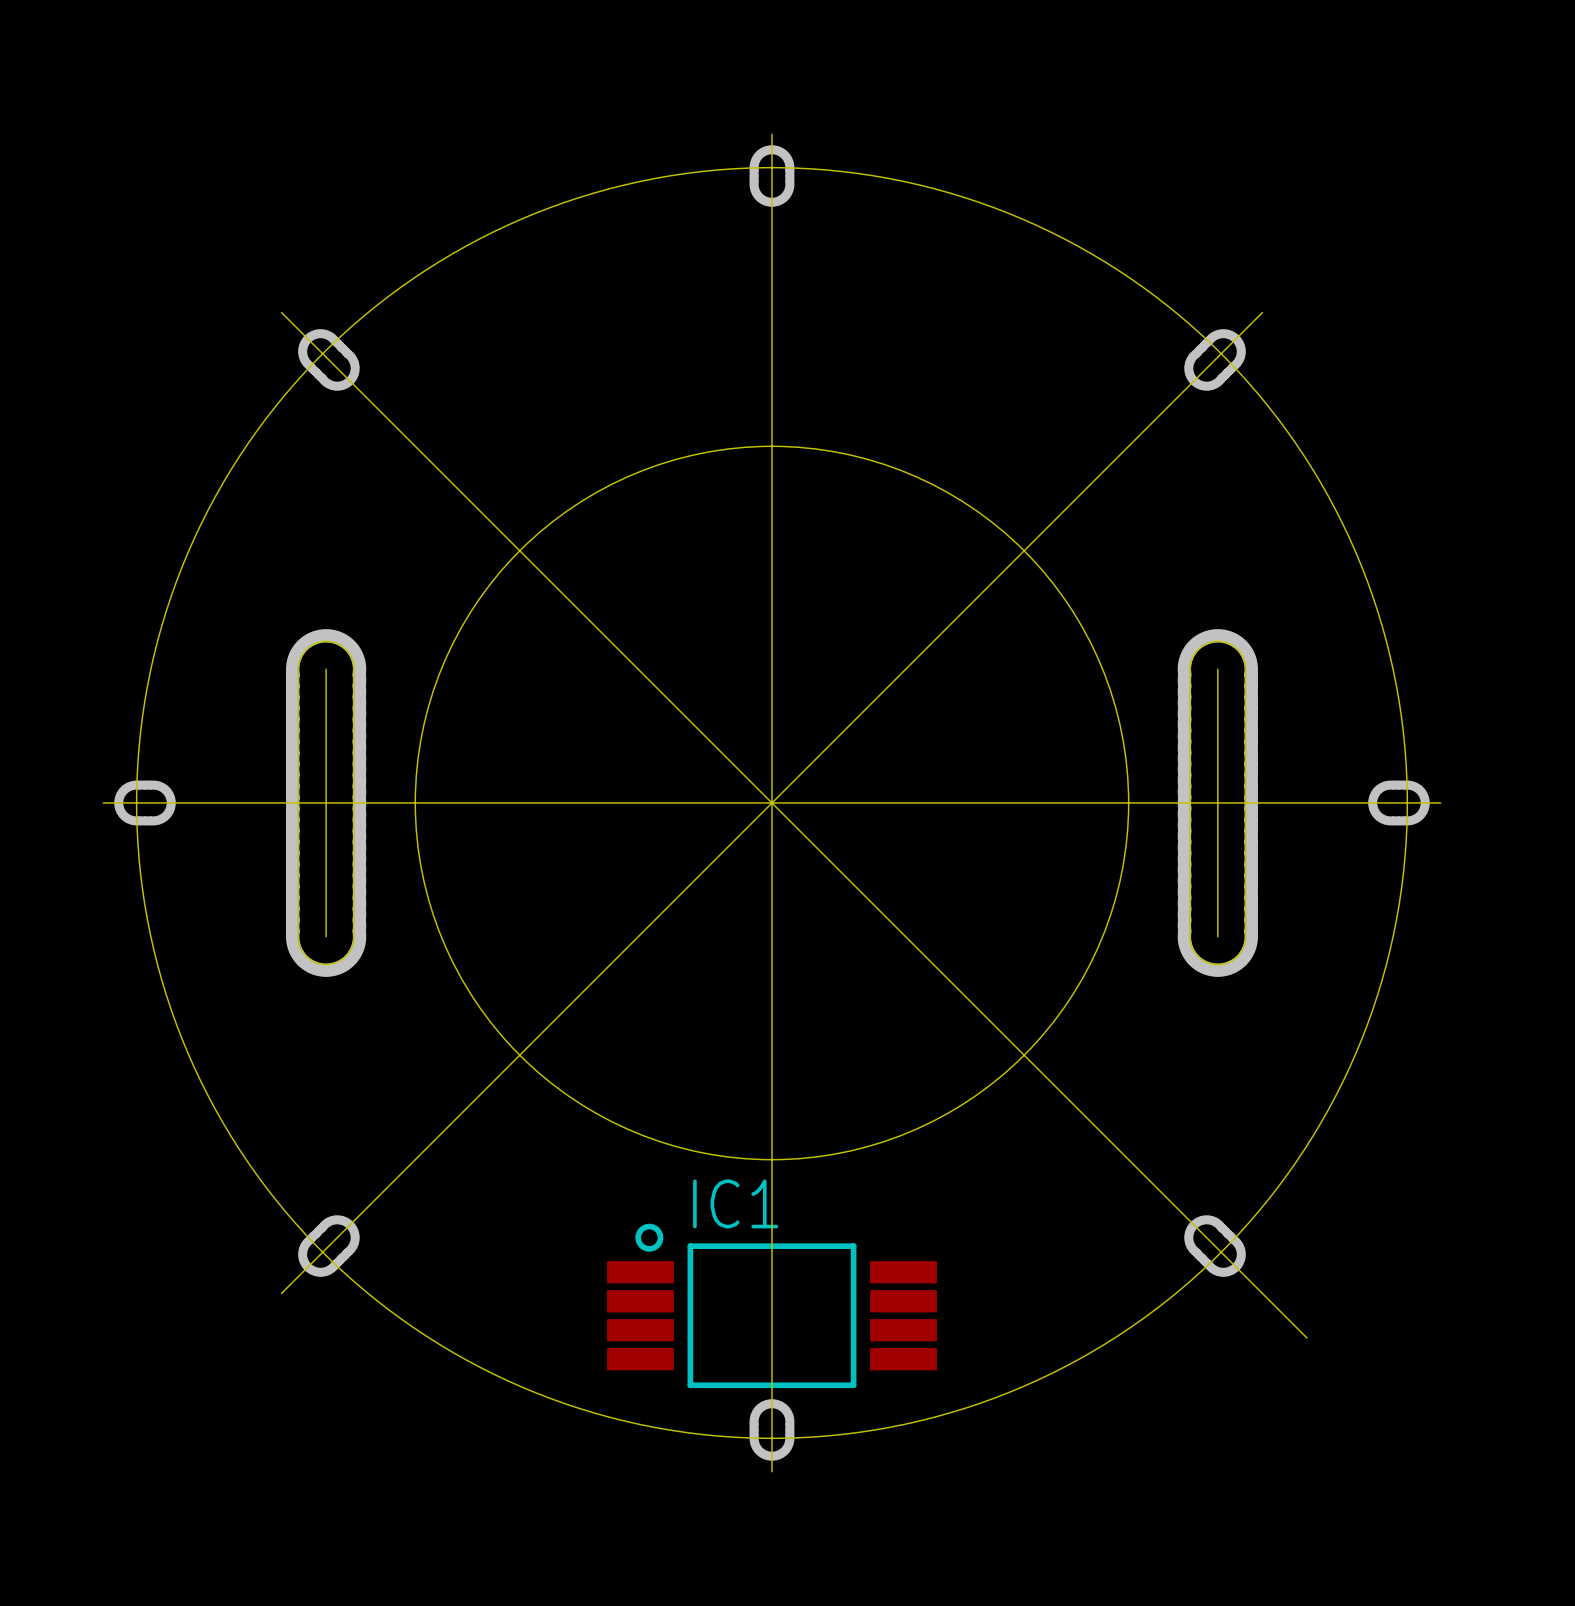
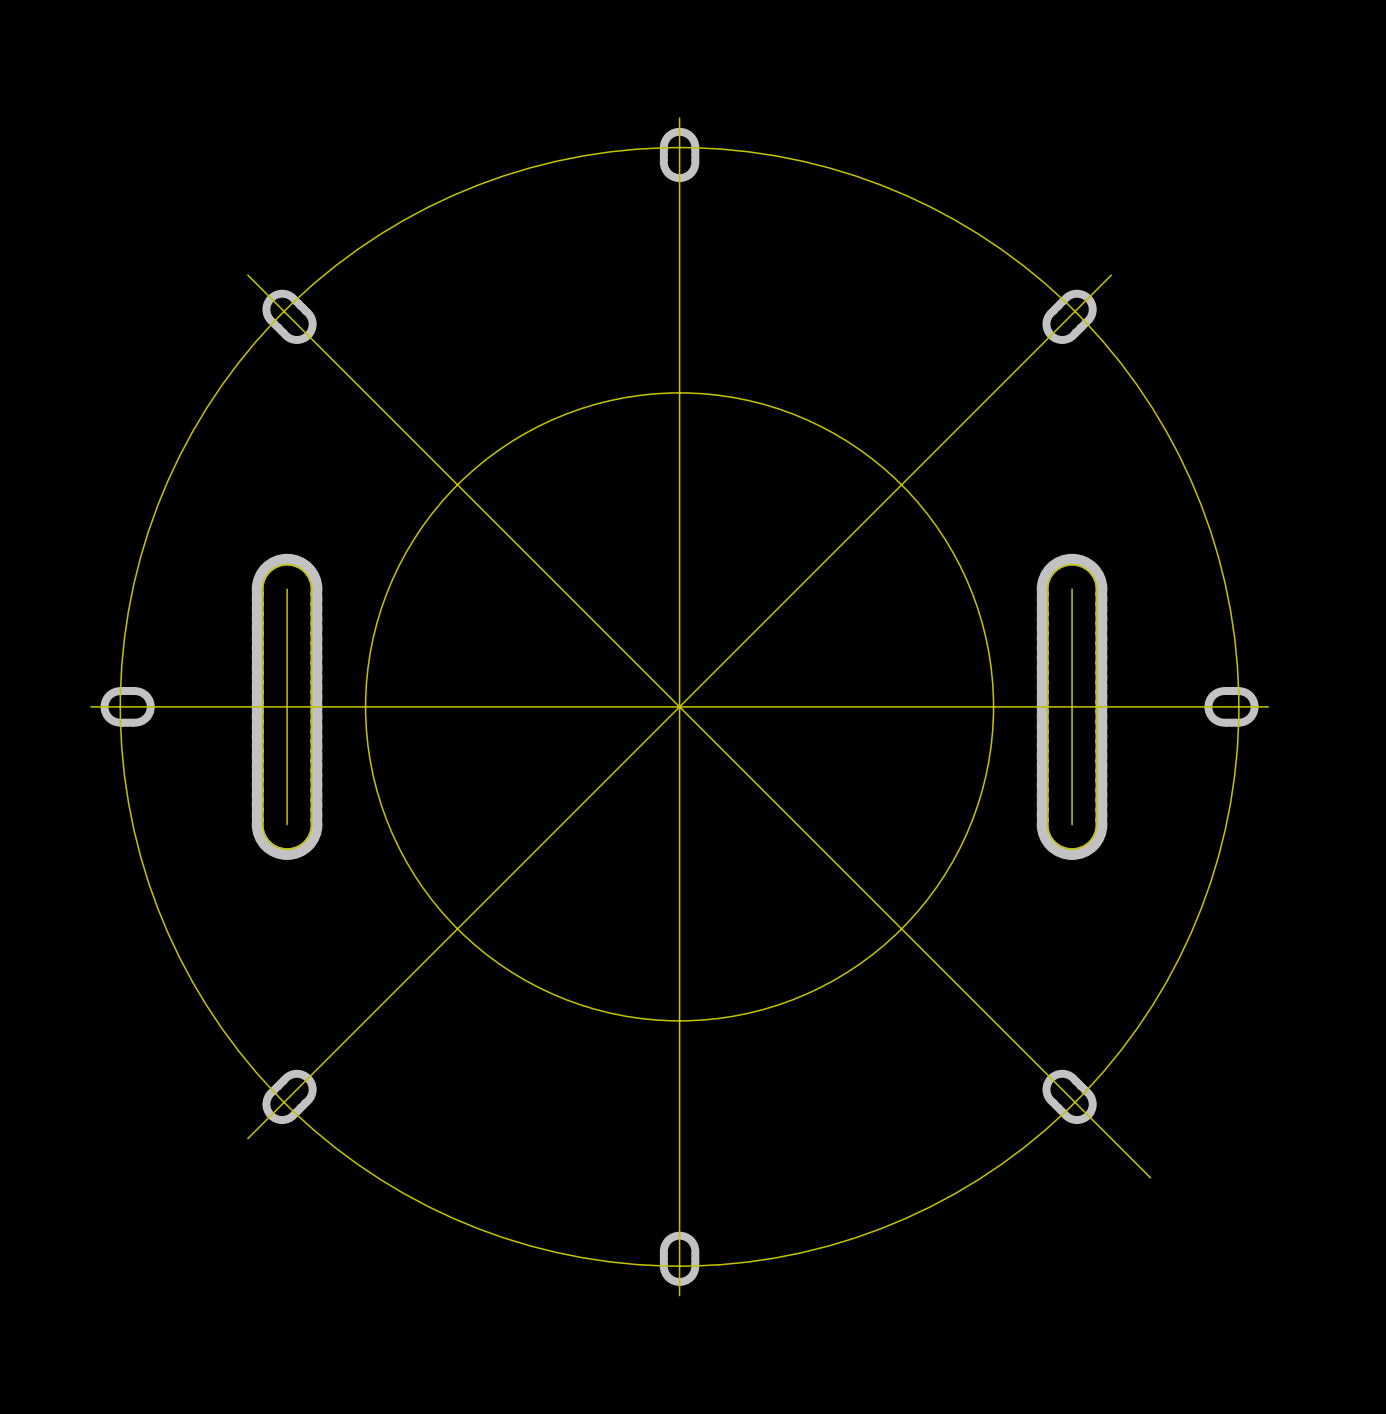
IC1: (771, 1305) -> none

